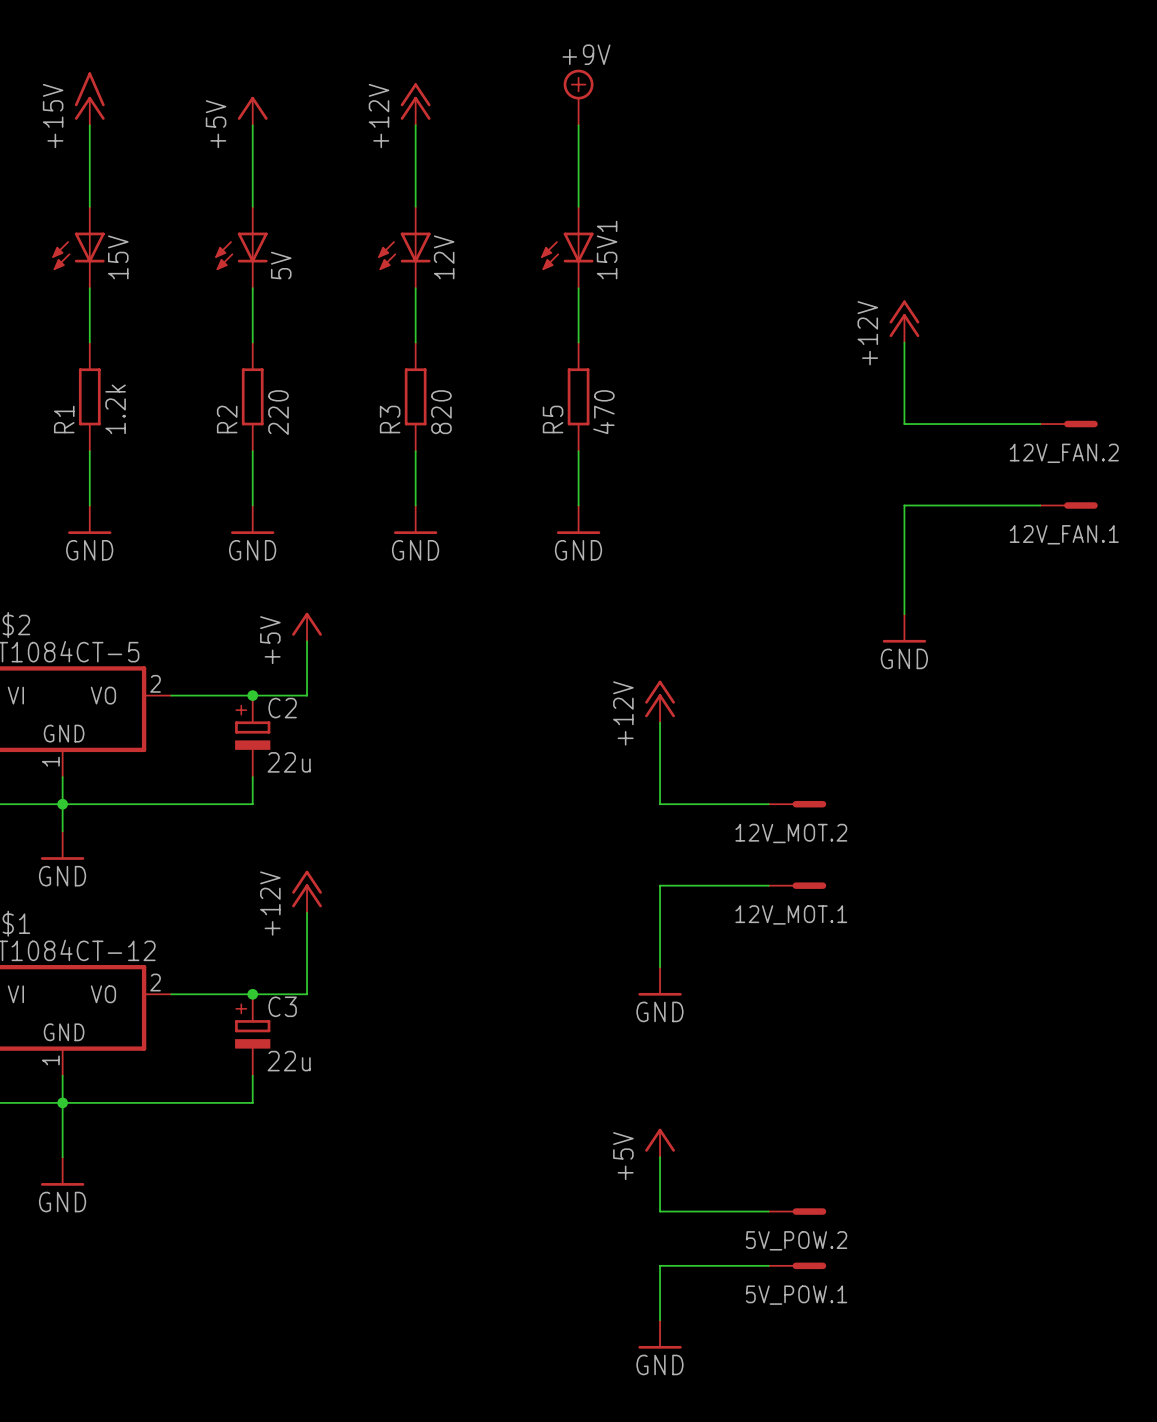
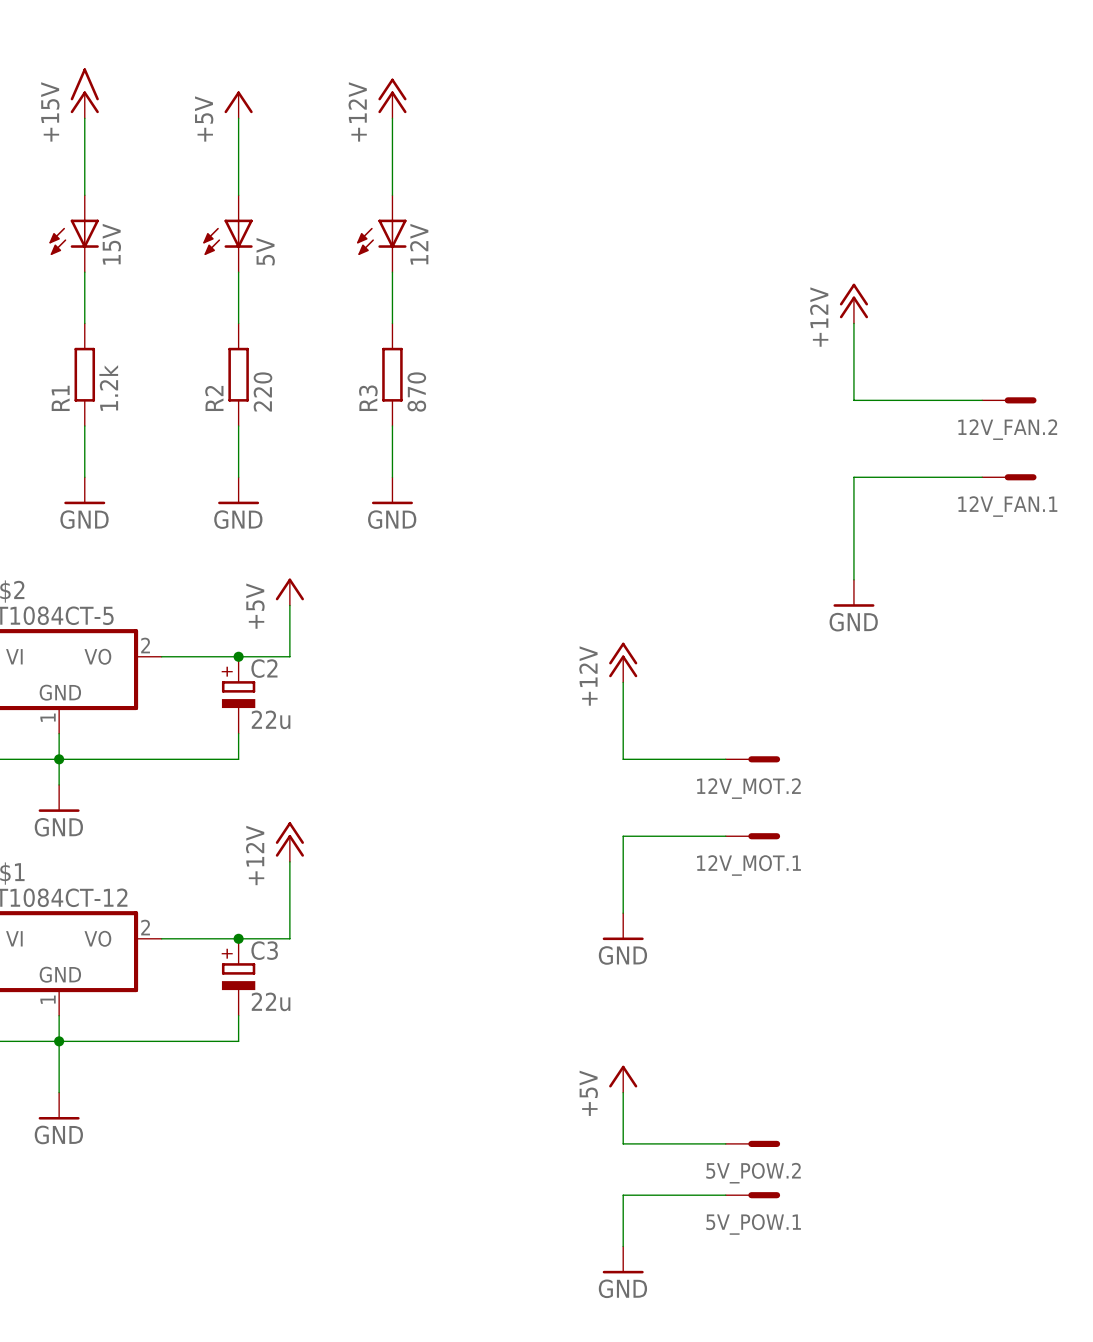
power symbol: +9V (578, 97) -> none
wire: (578, 125) (578, 206) -> none
15V1: (567, 247) -> none
wire: (578, 288) (578, 342) -> none
R5: 470 (578, 396) -> none
R3 value: 820 (441, 412) -> 870 (416, 392)
wire: (578, 451) (578, 505) -> none
power symbol: GND (578, 519) -> none

